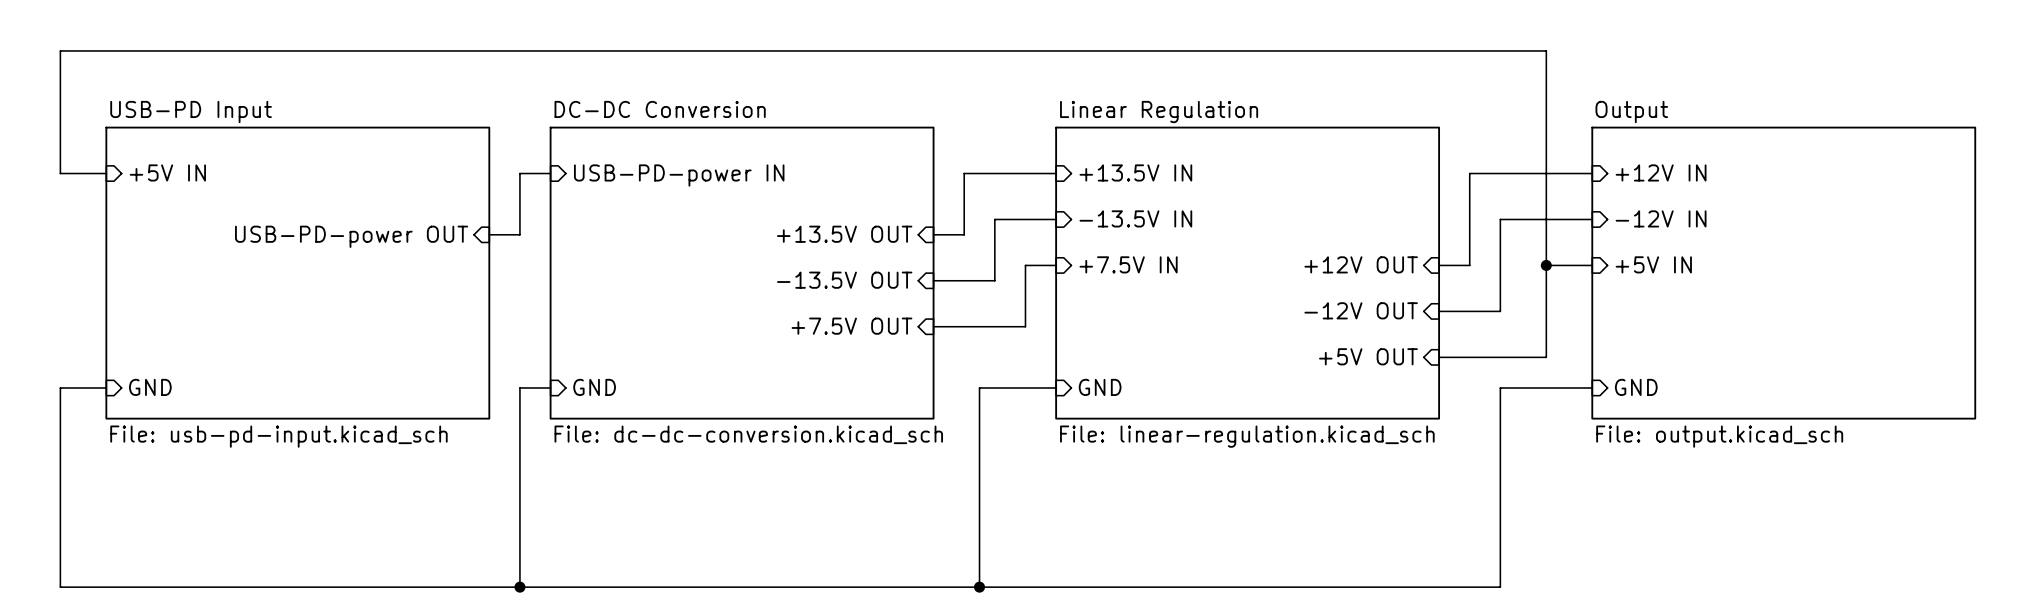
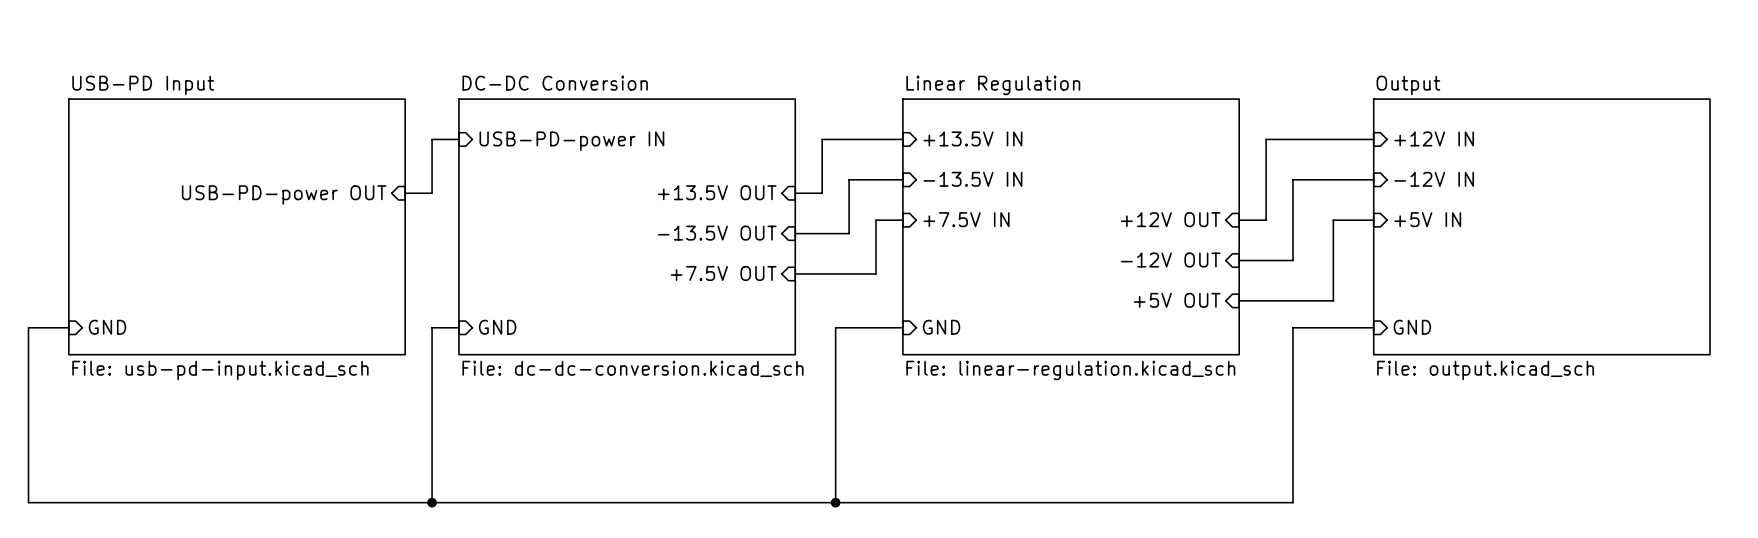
sheet pin: +5V IN (167, 172) -> none
wire: (106, 173) (60, 173) (60, 50) (1546, 50) (1546, 265) -> none
junction: (1546, 265) -> none

